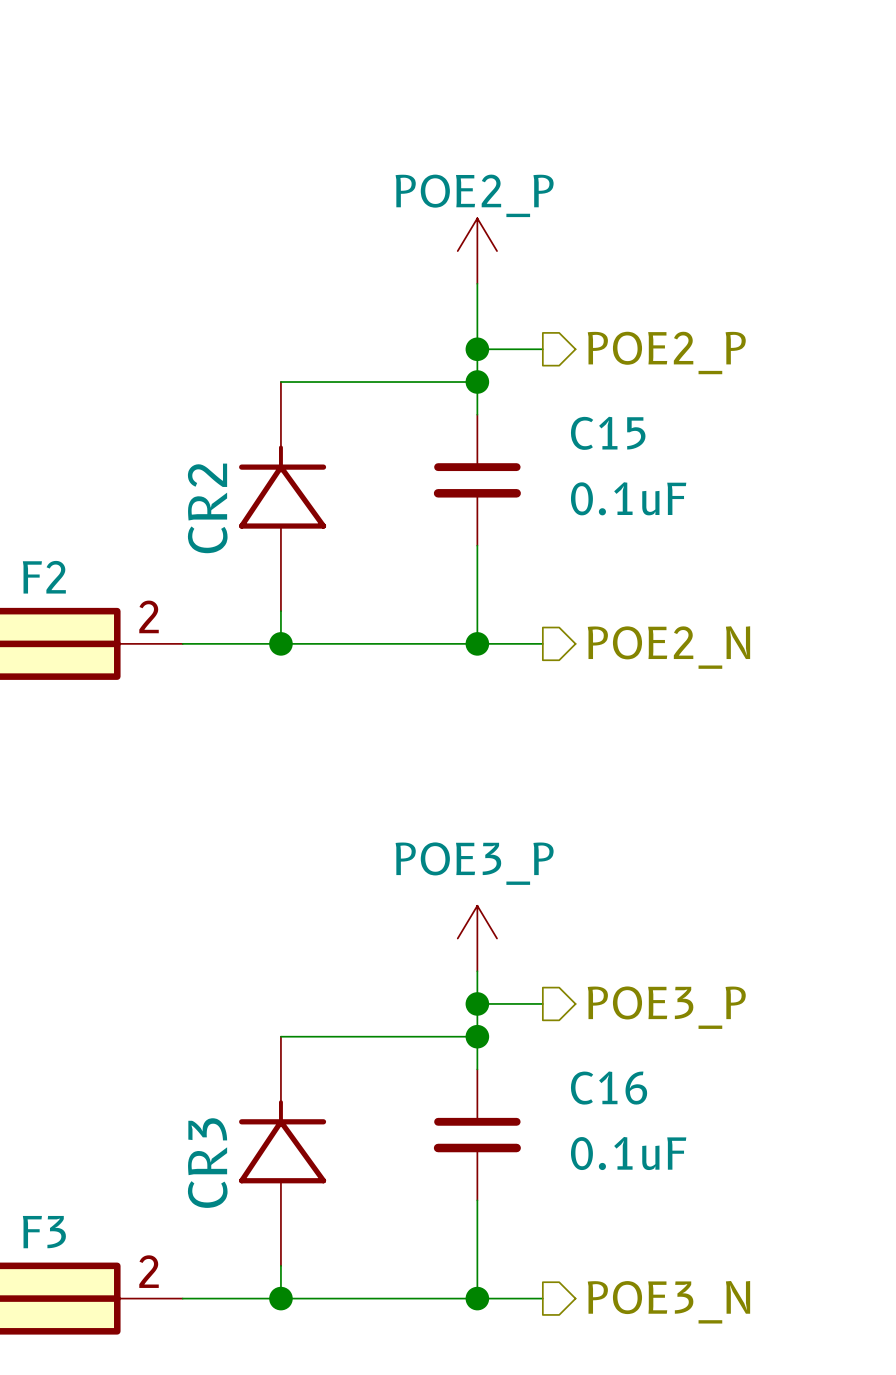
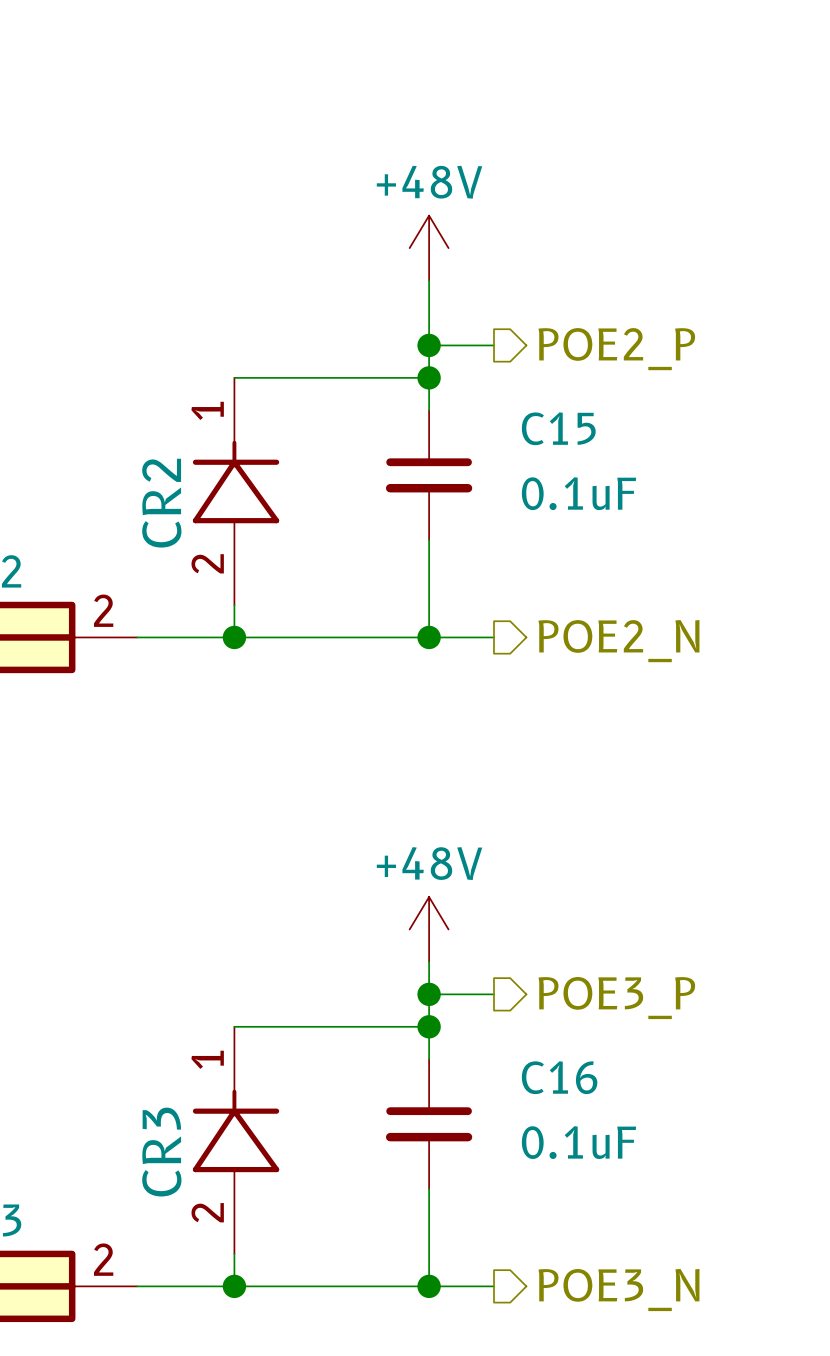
power symbol: POE2_P (477, 251) -> +48V (429, 248)
CR2 pin number: none -> 1 (207, 410)
CR2 pin number: none -> 2 (207, 563)
power symbol: POE3_P (477, 938) -> +48V (429, 929)
CR3 pin number: none -> 1 (207, 1059)
CR3 pin number: none -> 2 (207, 1212)

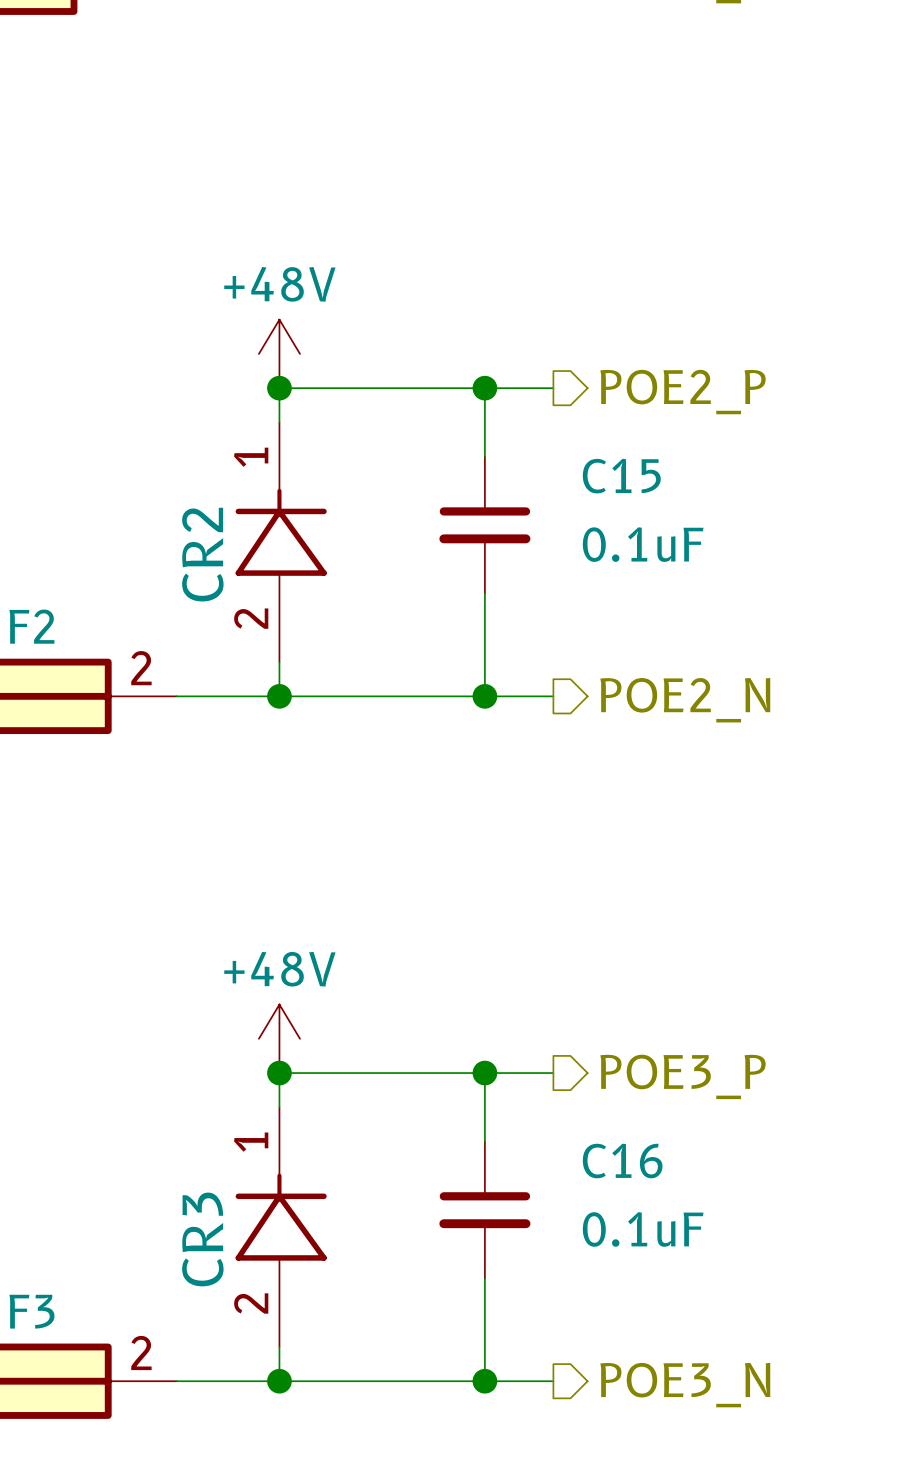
power symbol position: +48V (429, 248) -> +48V (279, 353)
wire: (429, 280) (429, 345) -> none
junction: none -> (279, 388)
wire: (234, 377) (429, 377) -> (279, 422) (279, 388) (484, 388)
junction: (429, 377) -> none
power symbol position: +48V (429, 929) -> +48V (279, 1038)
wire: (429, 961) (429, 994) -> none
junction: none -> (279, 1073)
wire: (234, 1026) (429, 1026) -> (279, 1107) (279, 1073) (484, 1073)
junction: (429, 1026) -> none

